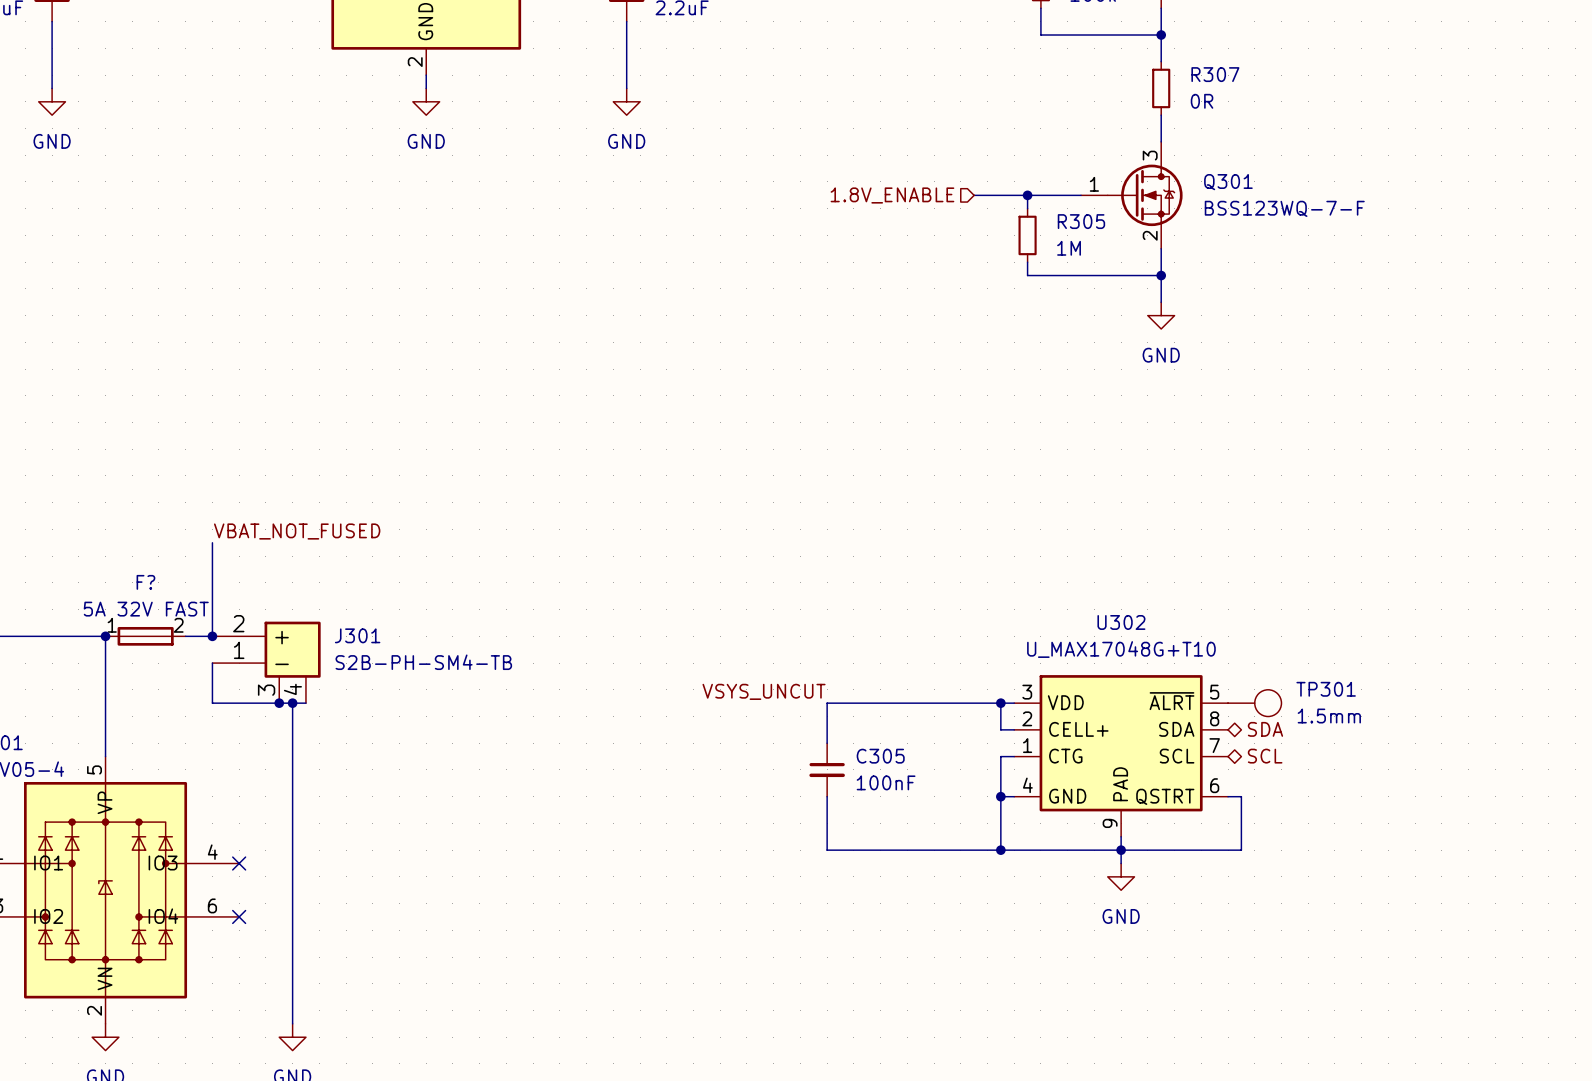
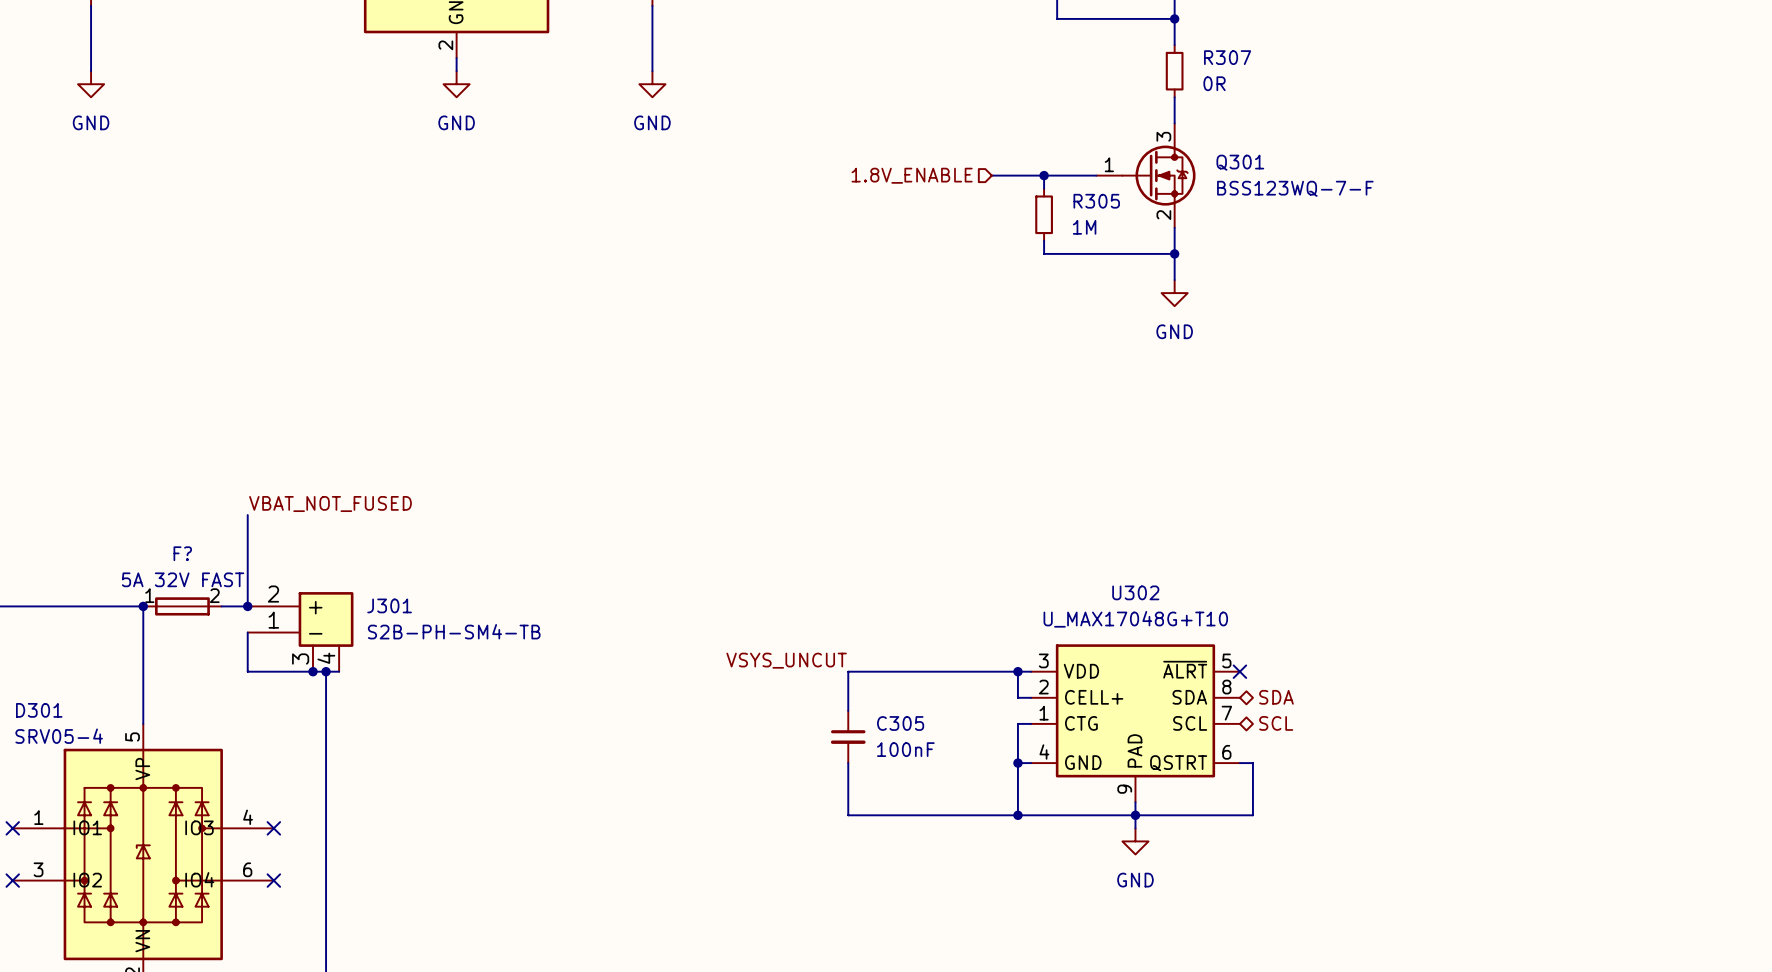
no-connect mark: none -> (1239, 671)
TP301: (1254, 703) -> none

